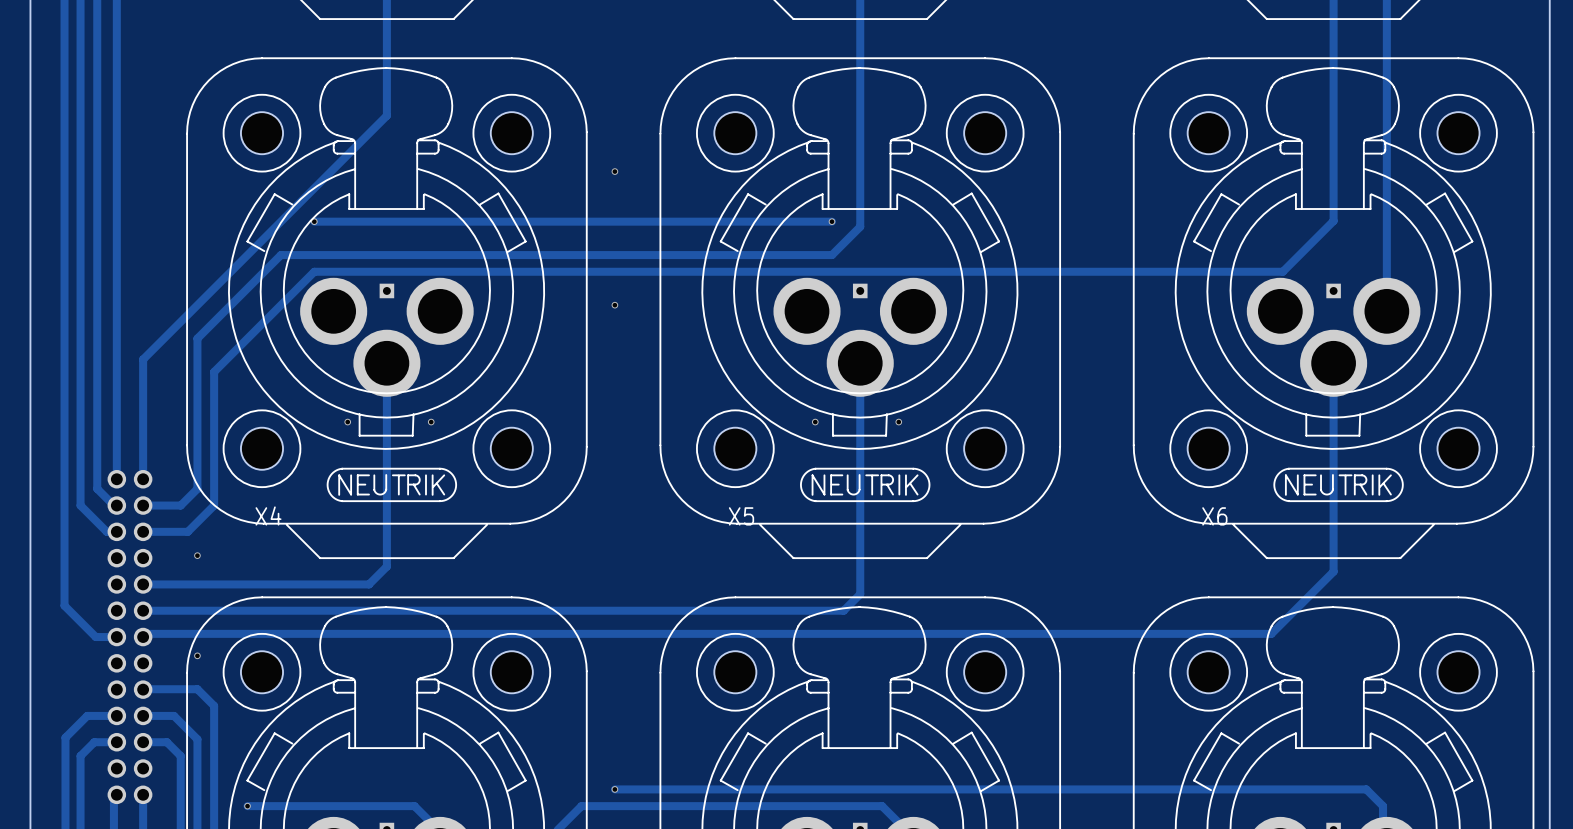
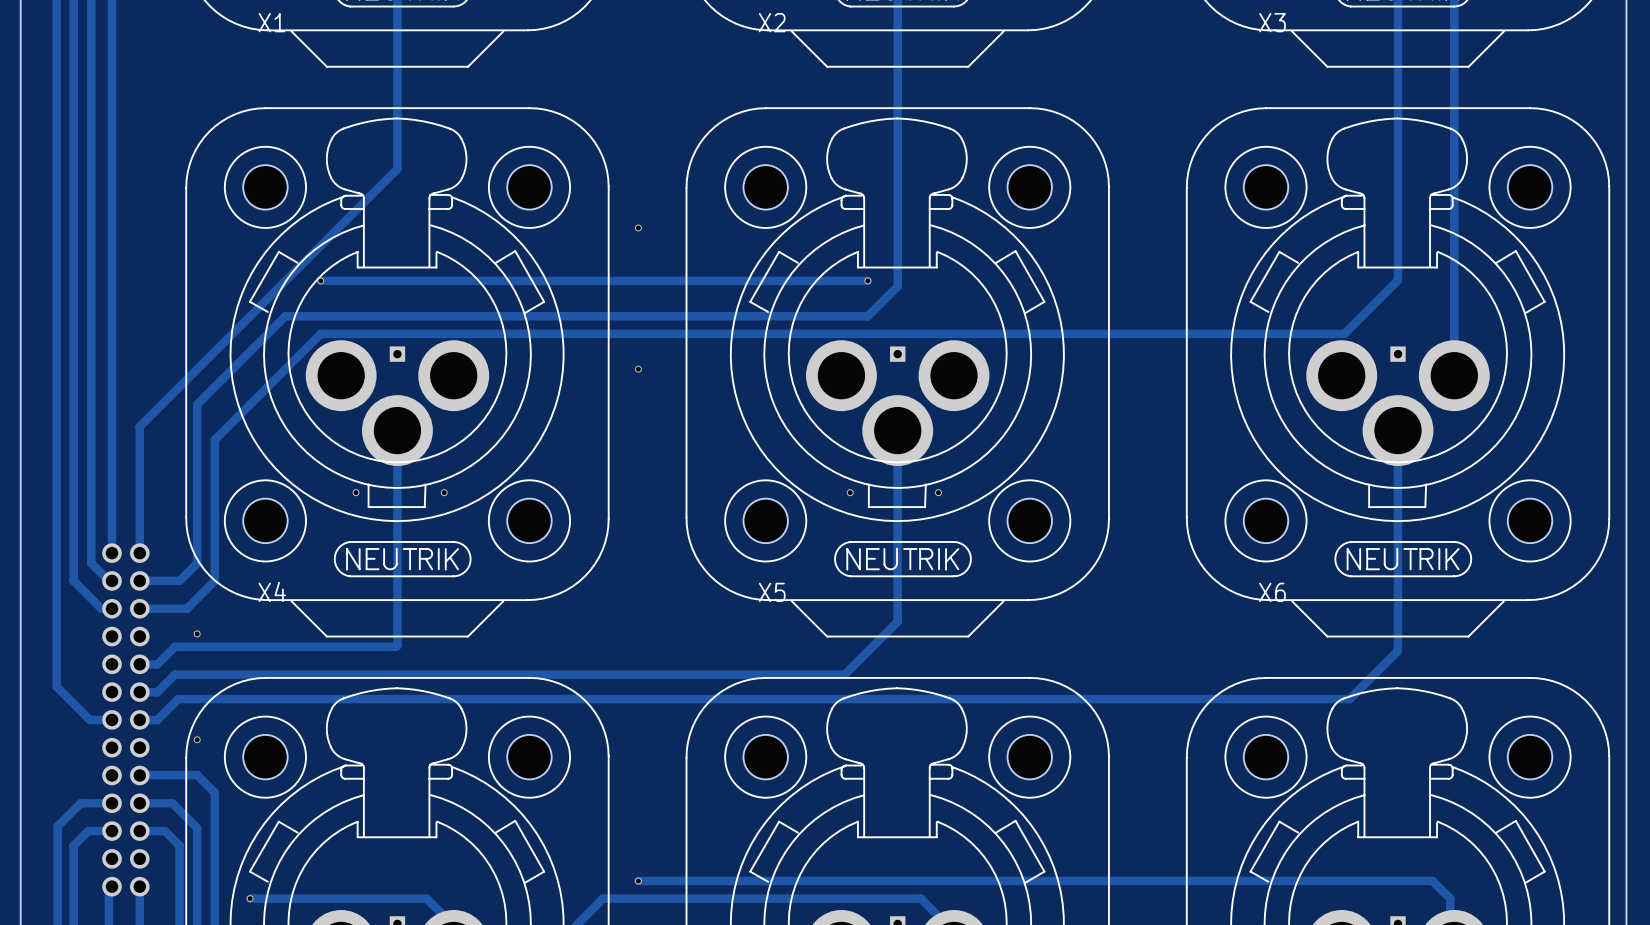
track: (860, 363) (860, 594) (843, 610) (143, 610) -> (897, 430) (897, 621) (844, 674) (174, 674) (157, 692) (139, 692)
track: (1333, 363) (1333, 571) (1271, 633) (146, 633) (143, 637) -> (1397, 430) (1397, 650) (1349, 699) (178, 699) (157, 720) (139, 720)
track: (385, 567) (369, 584) (143, 584) -> (396, 646) (174, 646) (157, 664) (139, 664)

